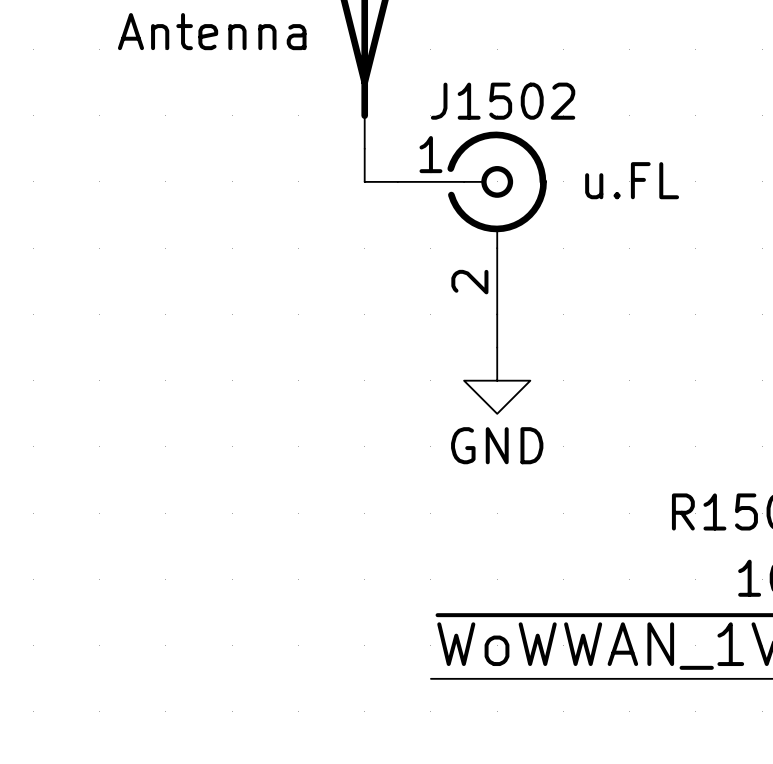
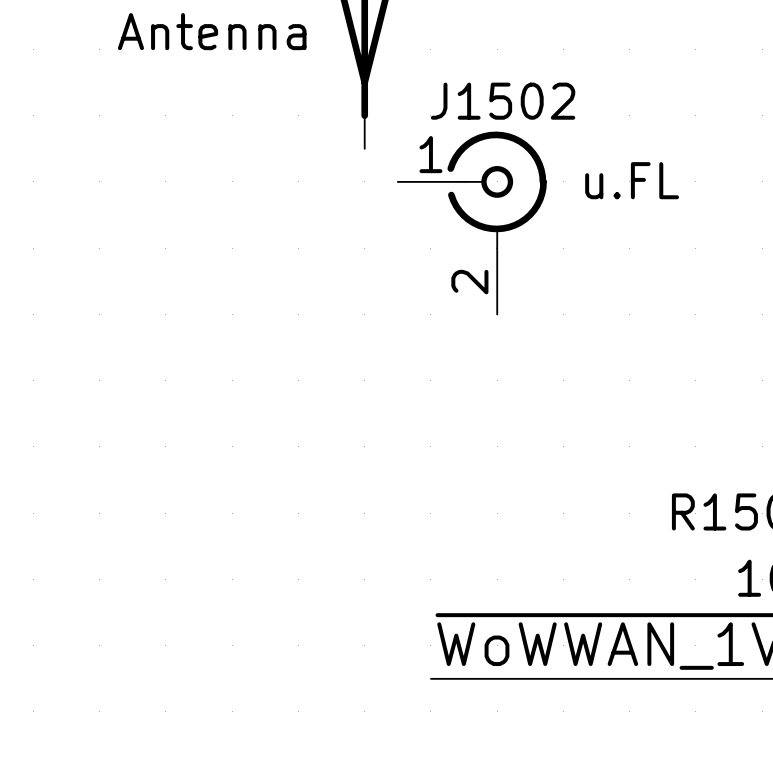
wire: (364, 148) (364, 181) (397, 181) -> none
wire: (497, 314) (497, 347) -> none
power symbol: GND (497, 380) -> none

